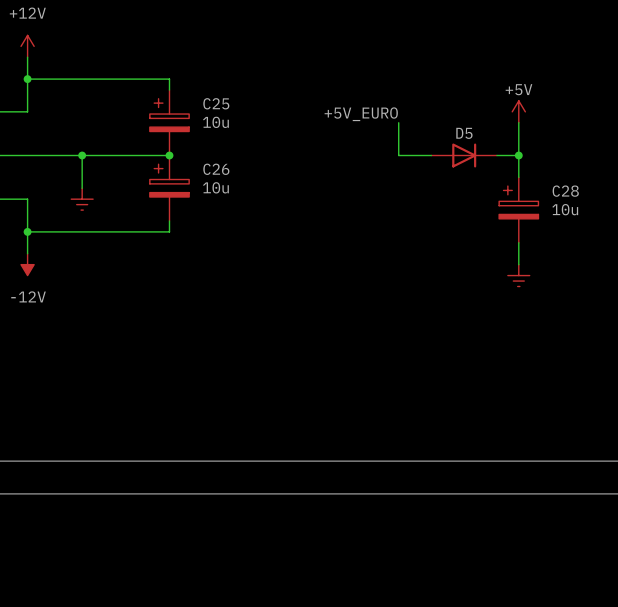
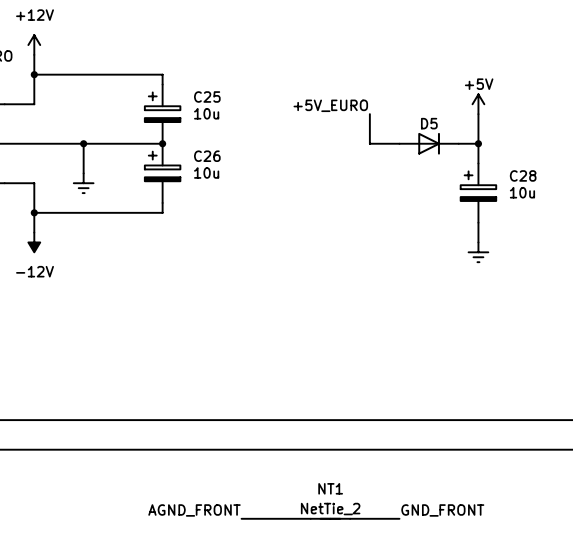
label: none -> AGND_FRONT (194, 510)
label: none -> GND_FRONT (442, 510)
wire: none -> (241, 518) (310, 518)
NT1: none -> NetTie_2 (330, 518)
wire: none -> (350, 518) (399, 518)

